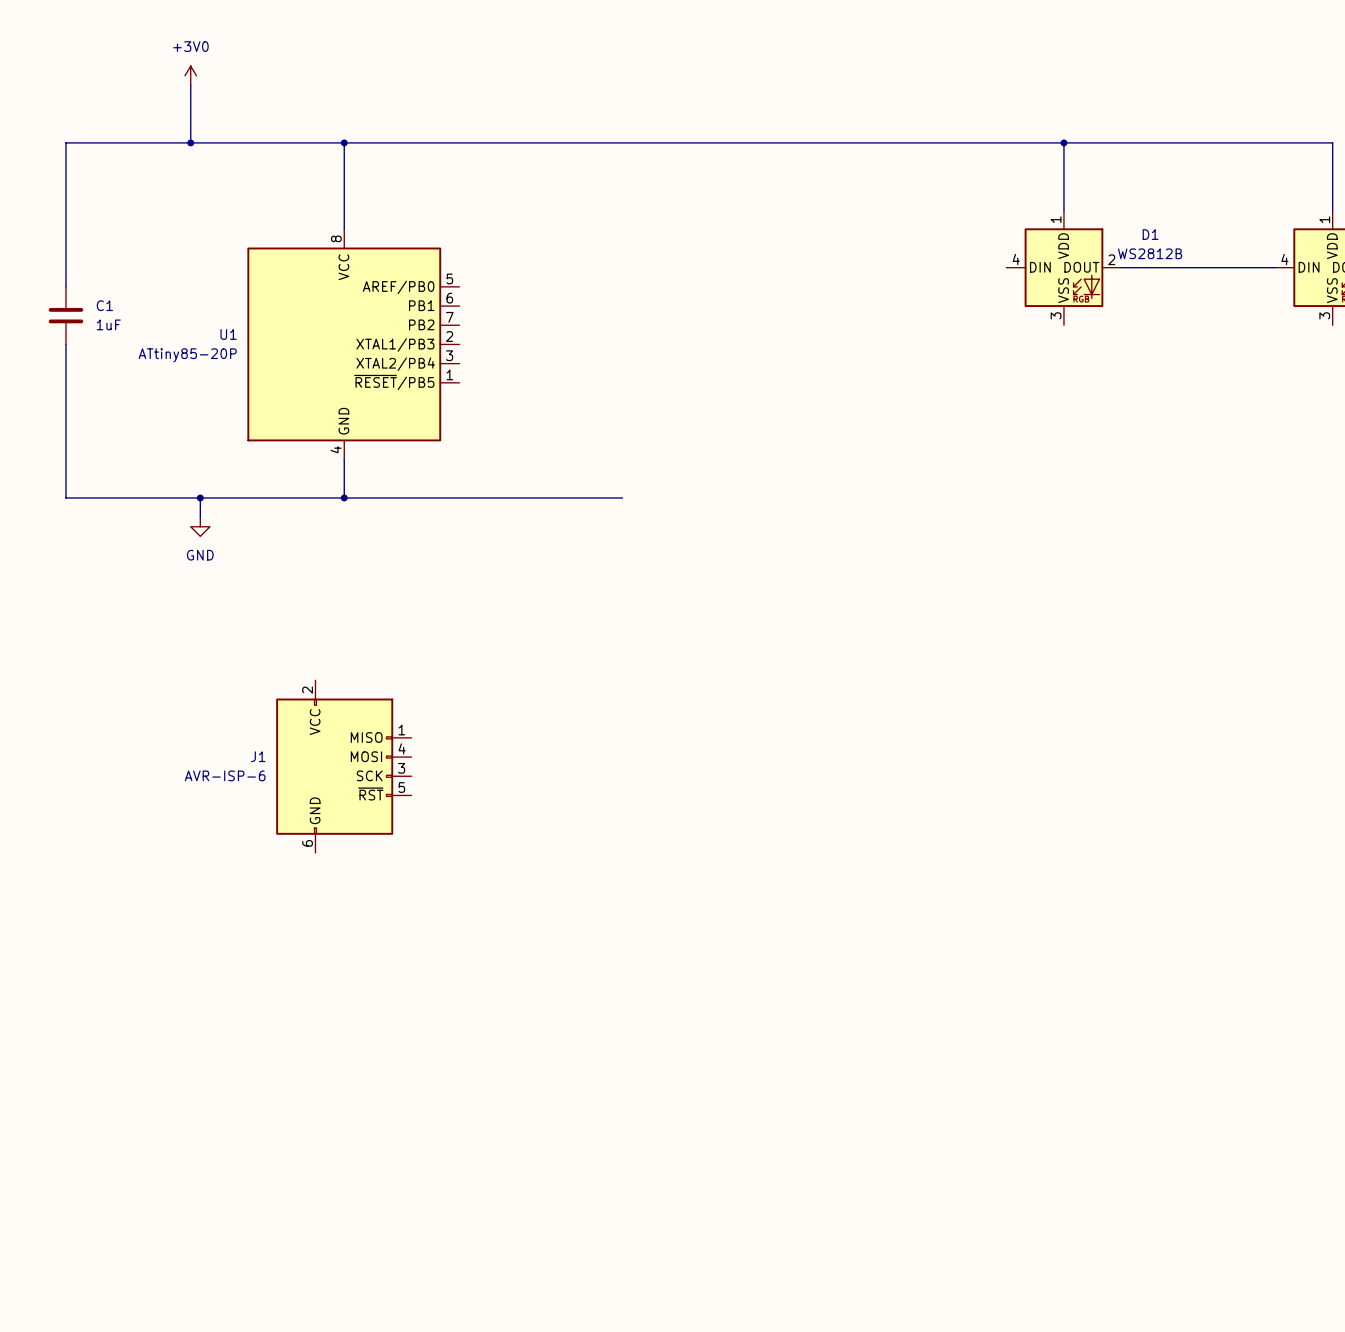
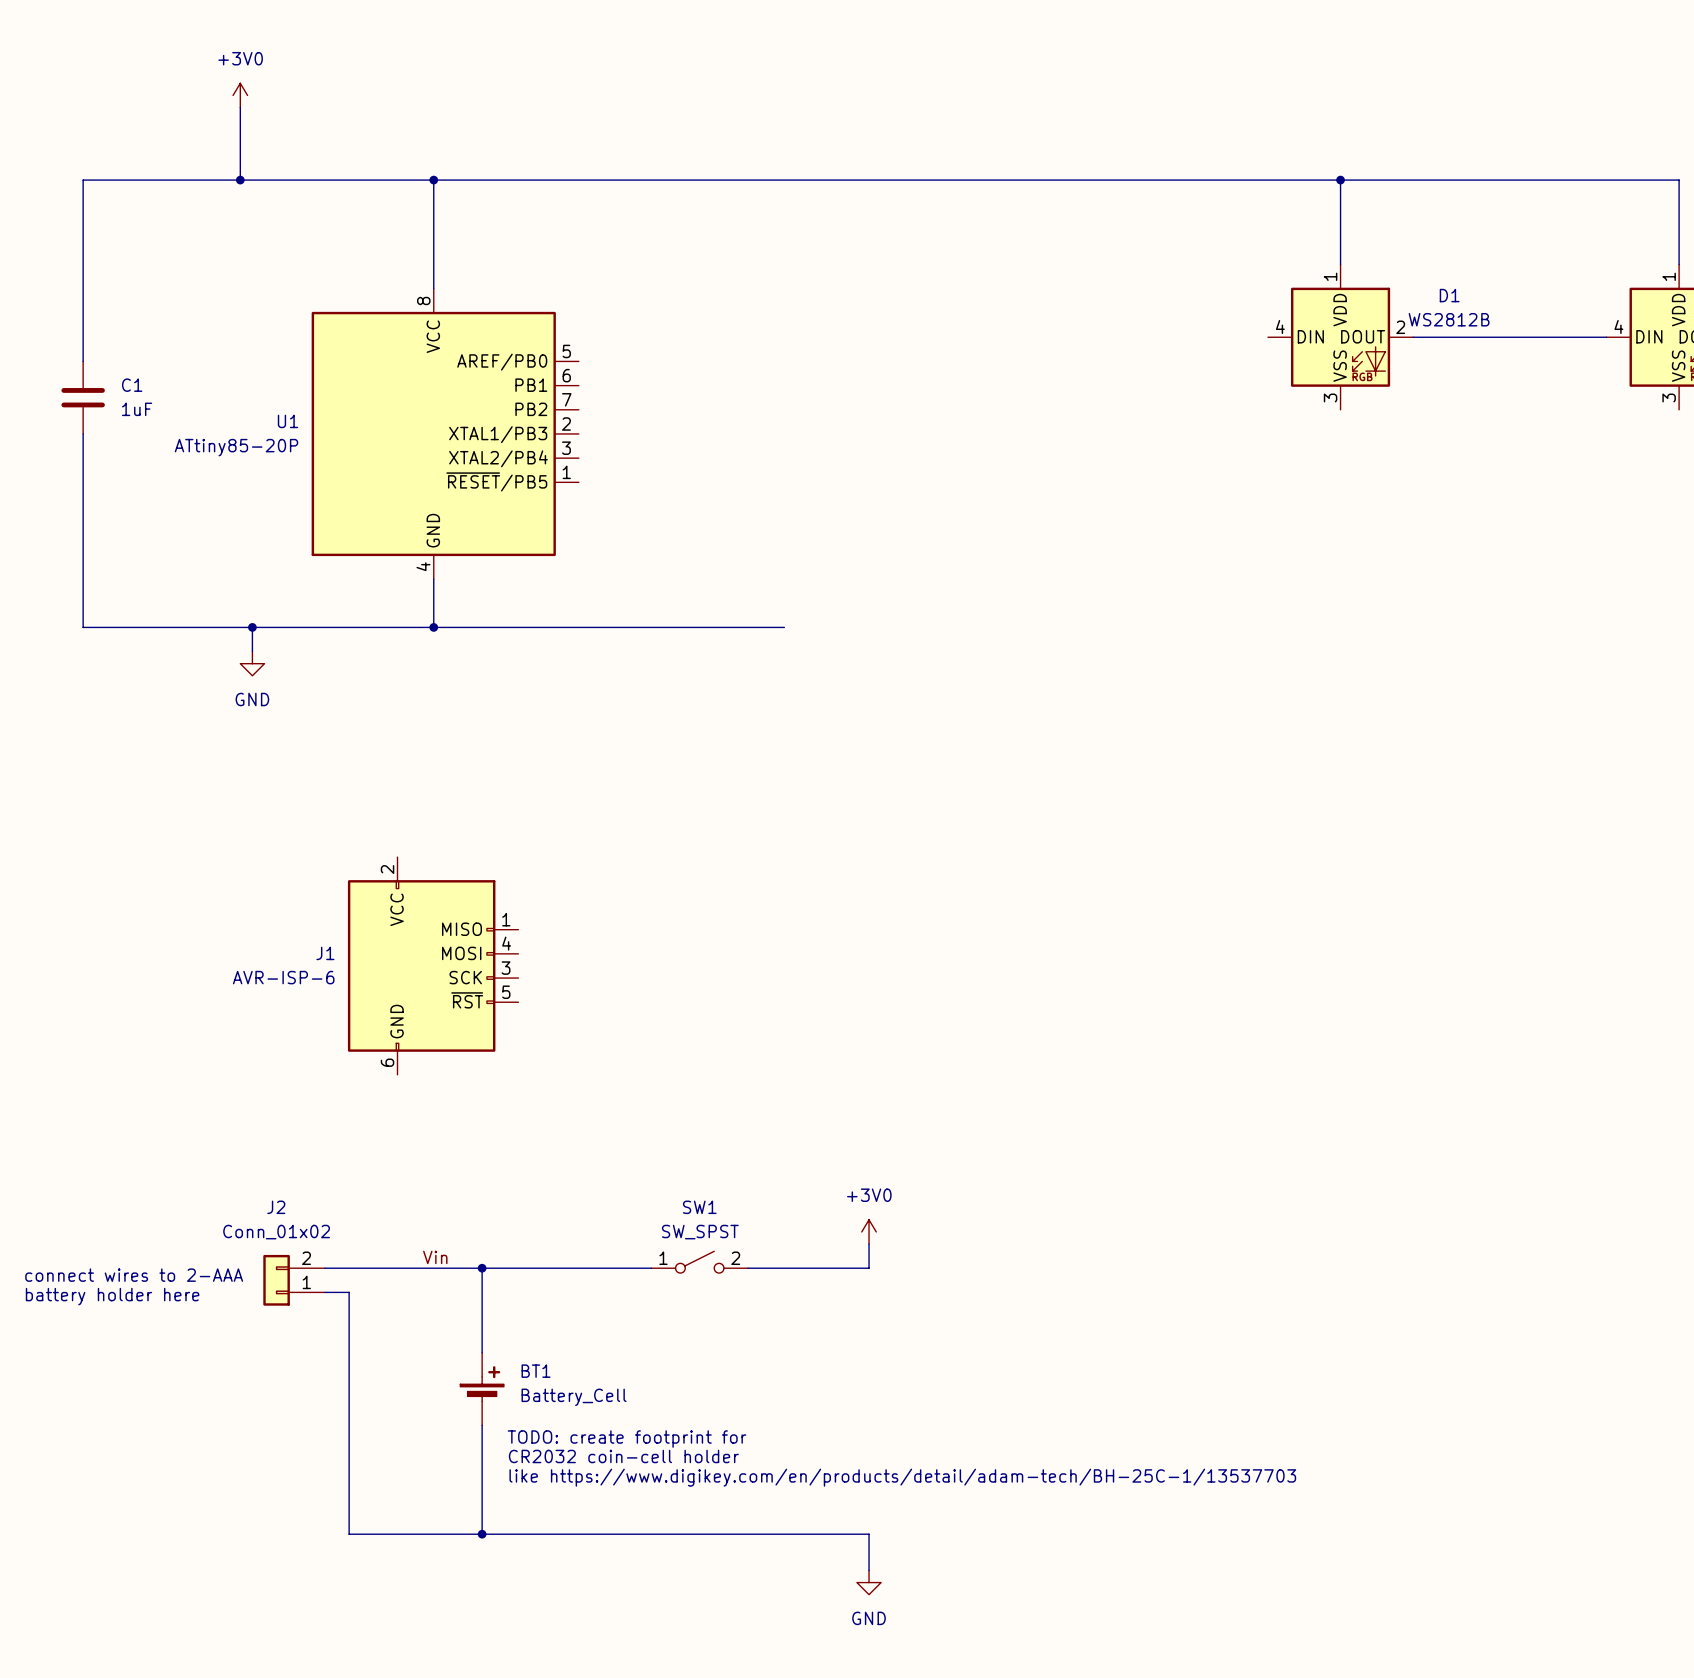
power symbol: none -> +3V0 (869, 1231)
wire: none -> (869, 1244) (869, 1268) (748, 1268)
label: none -> Vin (435, 1257)
SW1: none -> SW_SPST (699, 1262)
wire: none -> (324, 1268) (651, 1268)
wire: none -> (482, 1268) (482, 1352)
junction: none -> (482, 1268)
text: none -> connect wires to 2-AAA (134, 1275)
J2: none -> Conn_01x02 (294, 1280)
wire: none -> (324, 1292) (349, 1292) (349, 1534) (869, 1534) (869, 1570)
text: none -> battery holder here (112, 1296)
BT1: none -> Battery_Cell (482, 1389)
wire: none -> (482, 1425) (482, 1534)
text: none -> TODO: create footprint for (627, 1439)
text: none -> CR2032 coin-cell holder (623, 1456)
text: none -> like https://www.digikey.com/en/products/detail/adam-tech/BH-25C-1/13537703 (902, 1477)
junction: none -> (482, 1534)
power symbol: none -> GND (869, 1582)

